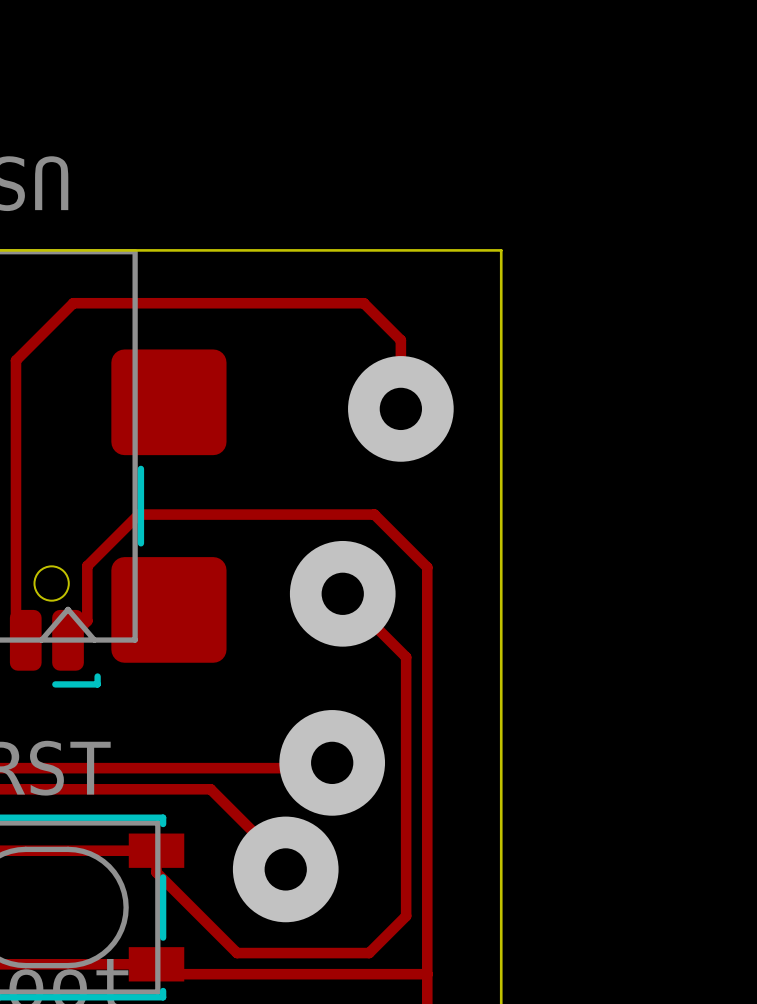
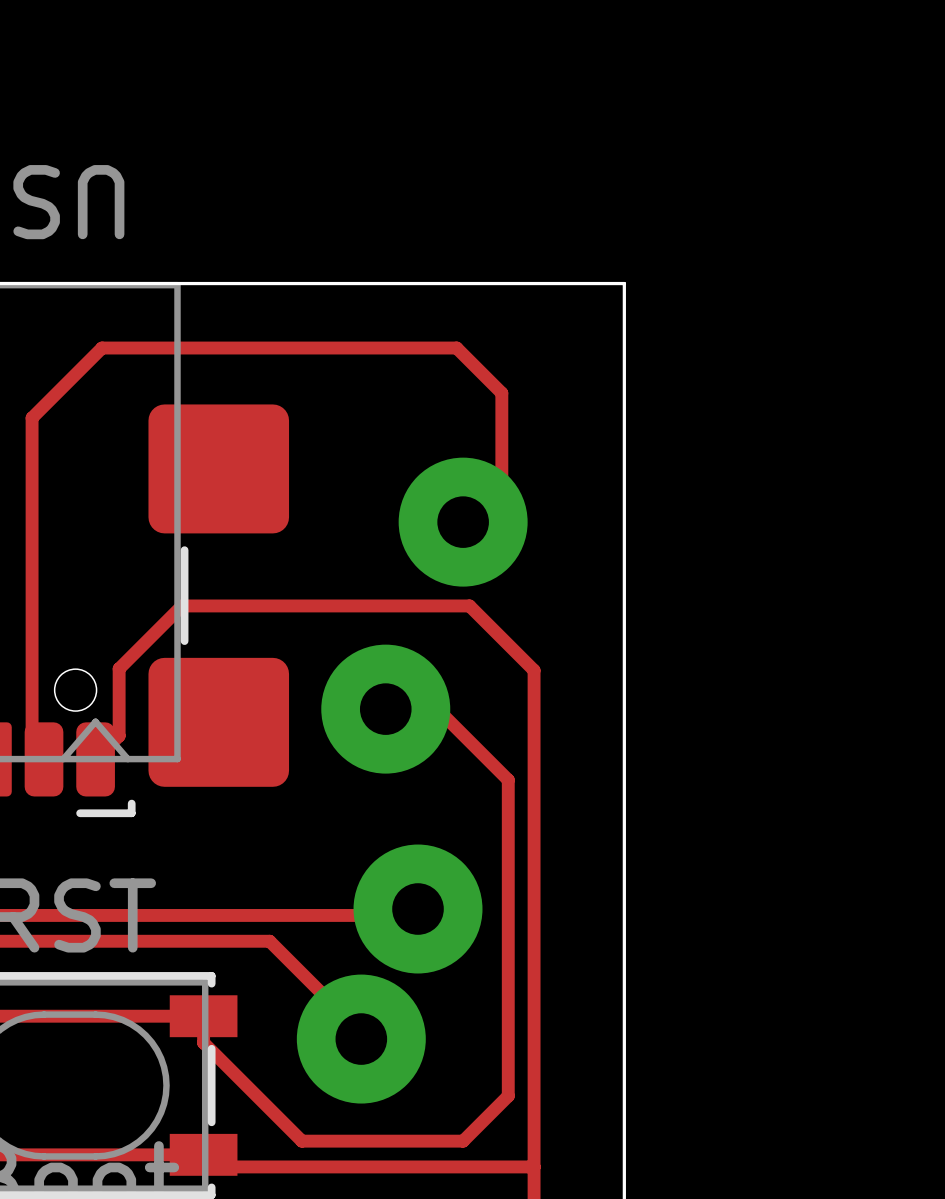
via position: (400, 408) -> (463, 522)
via position: (342, 593) -> (385, 709)

